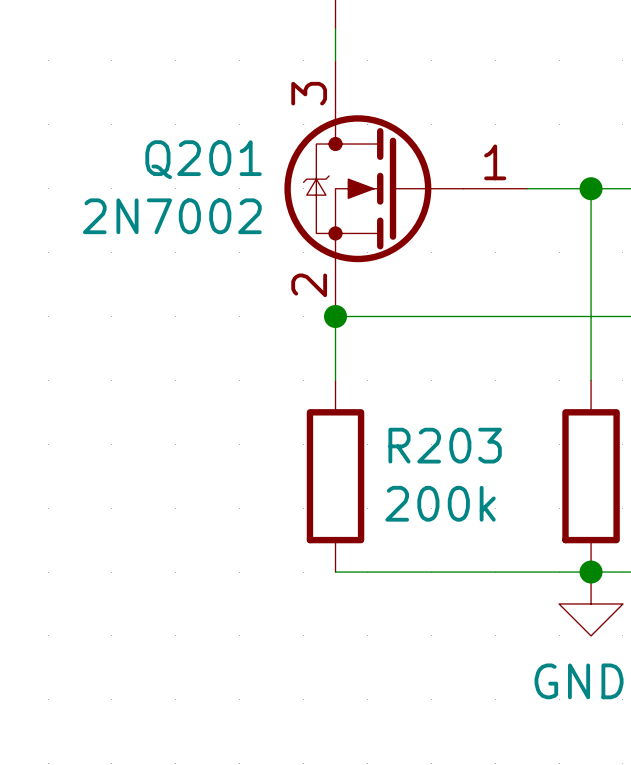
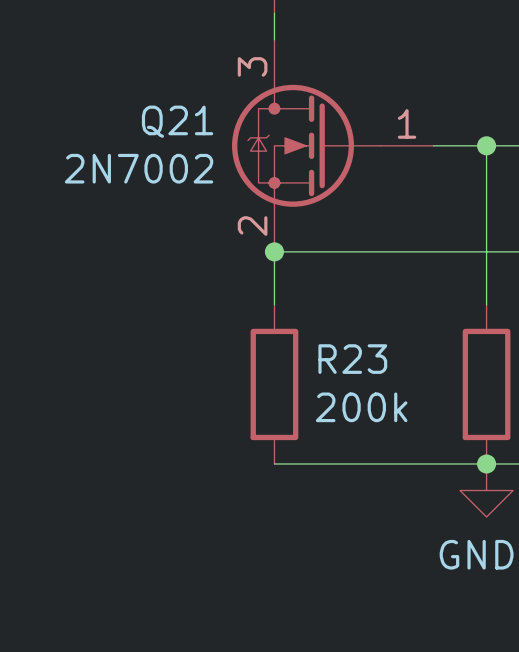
Q201 name: Q201 (203, 159) -> Q21 (177, 121)
R203 name: R203 (445, 445) -> R23 (352, 359)

